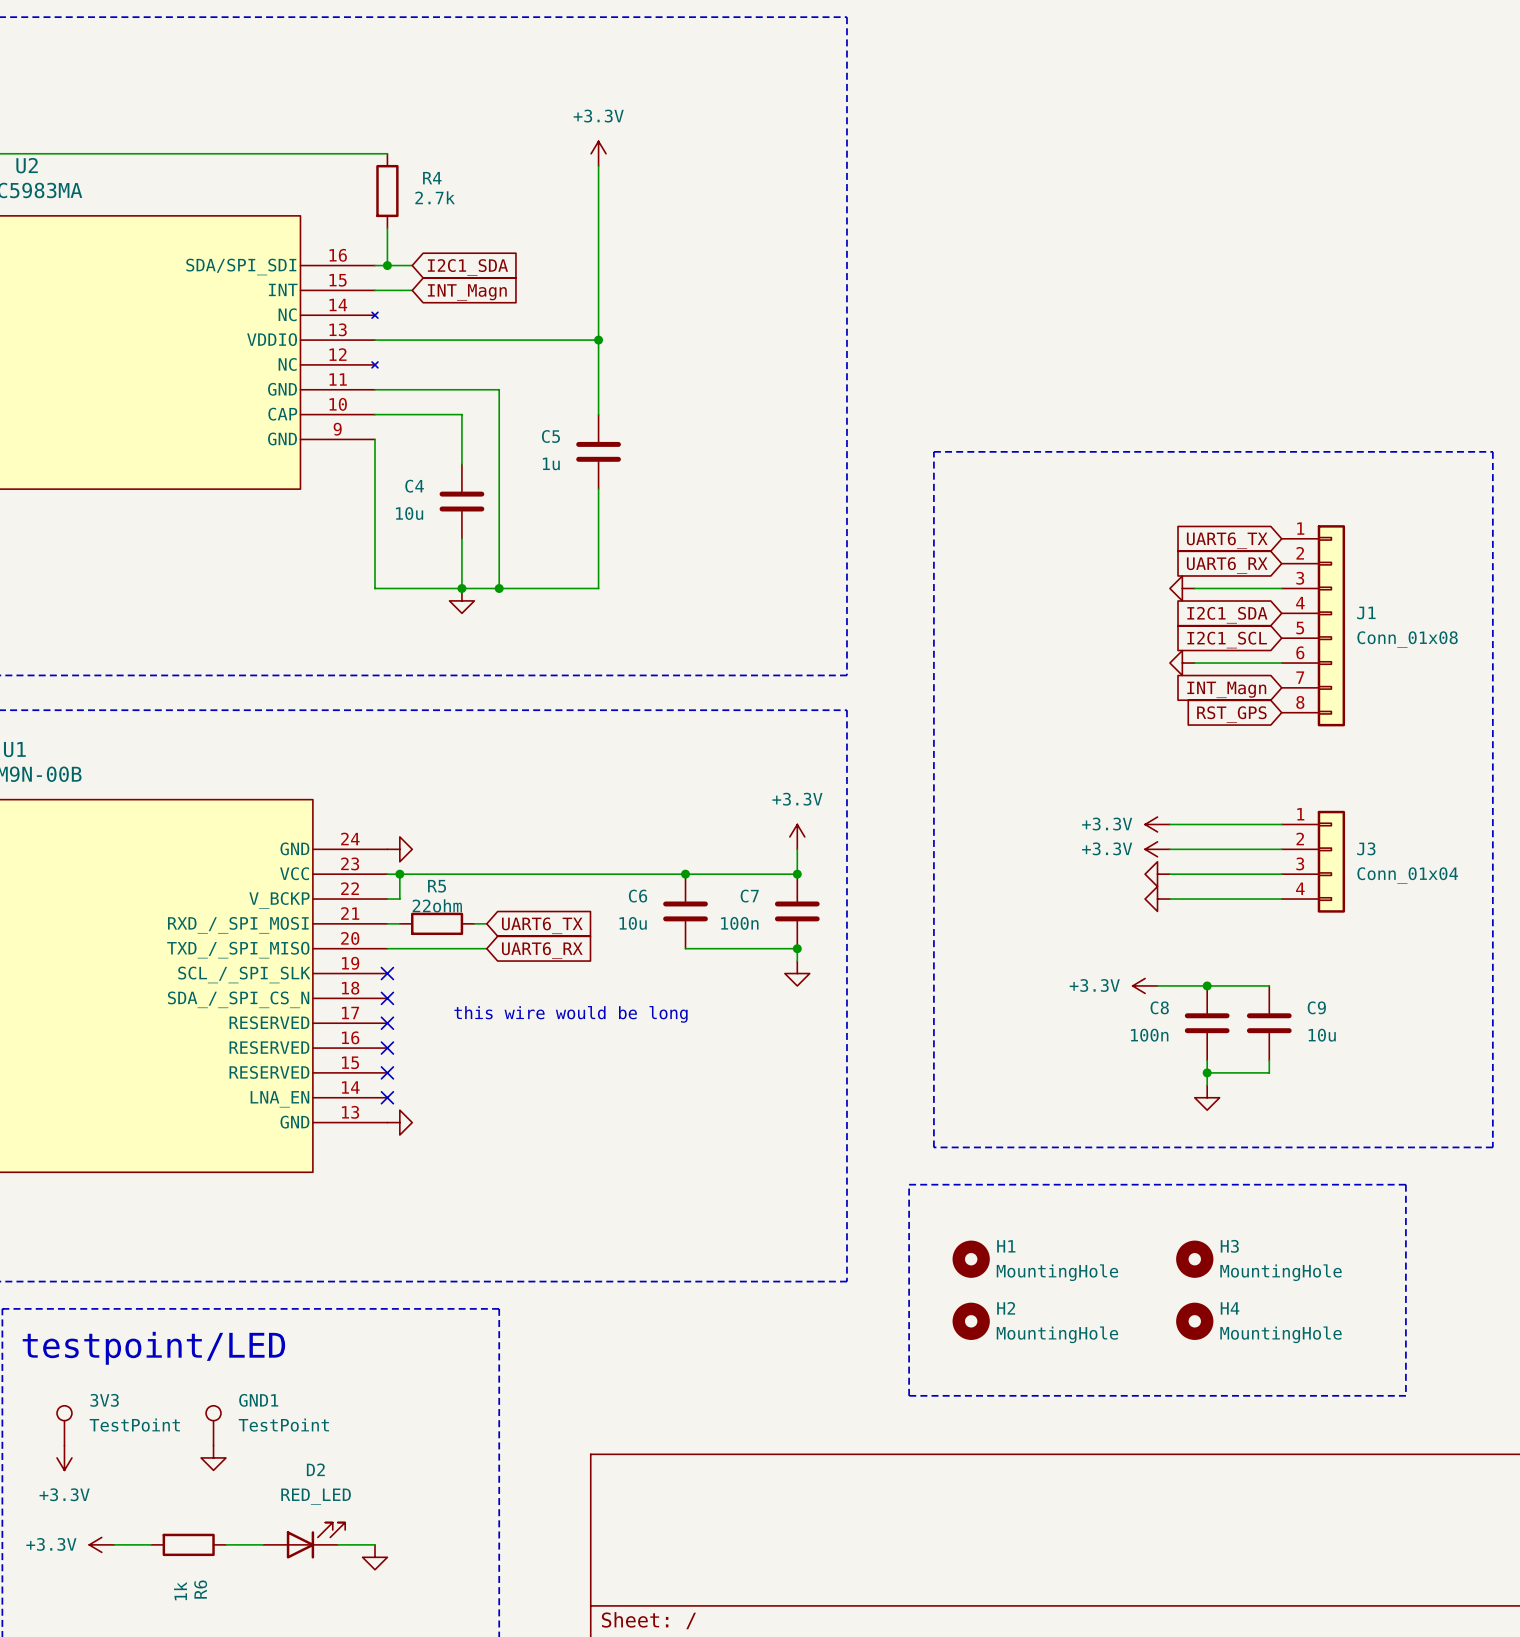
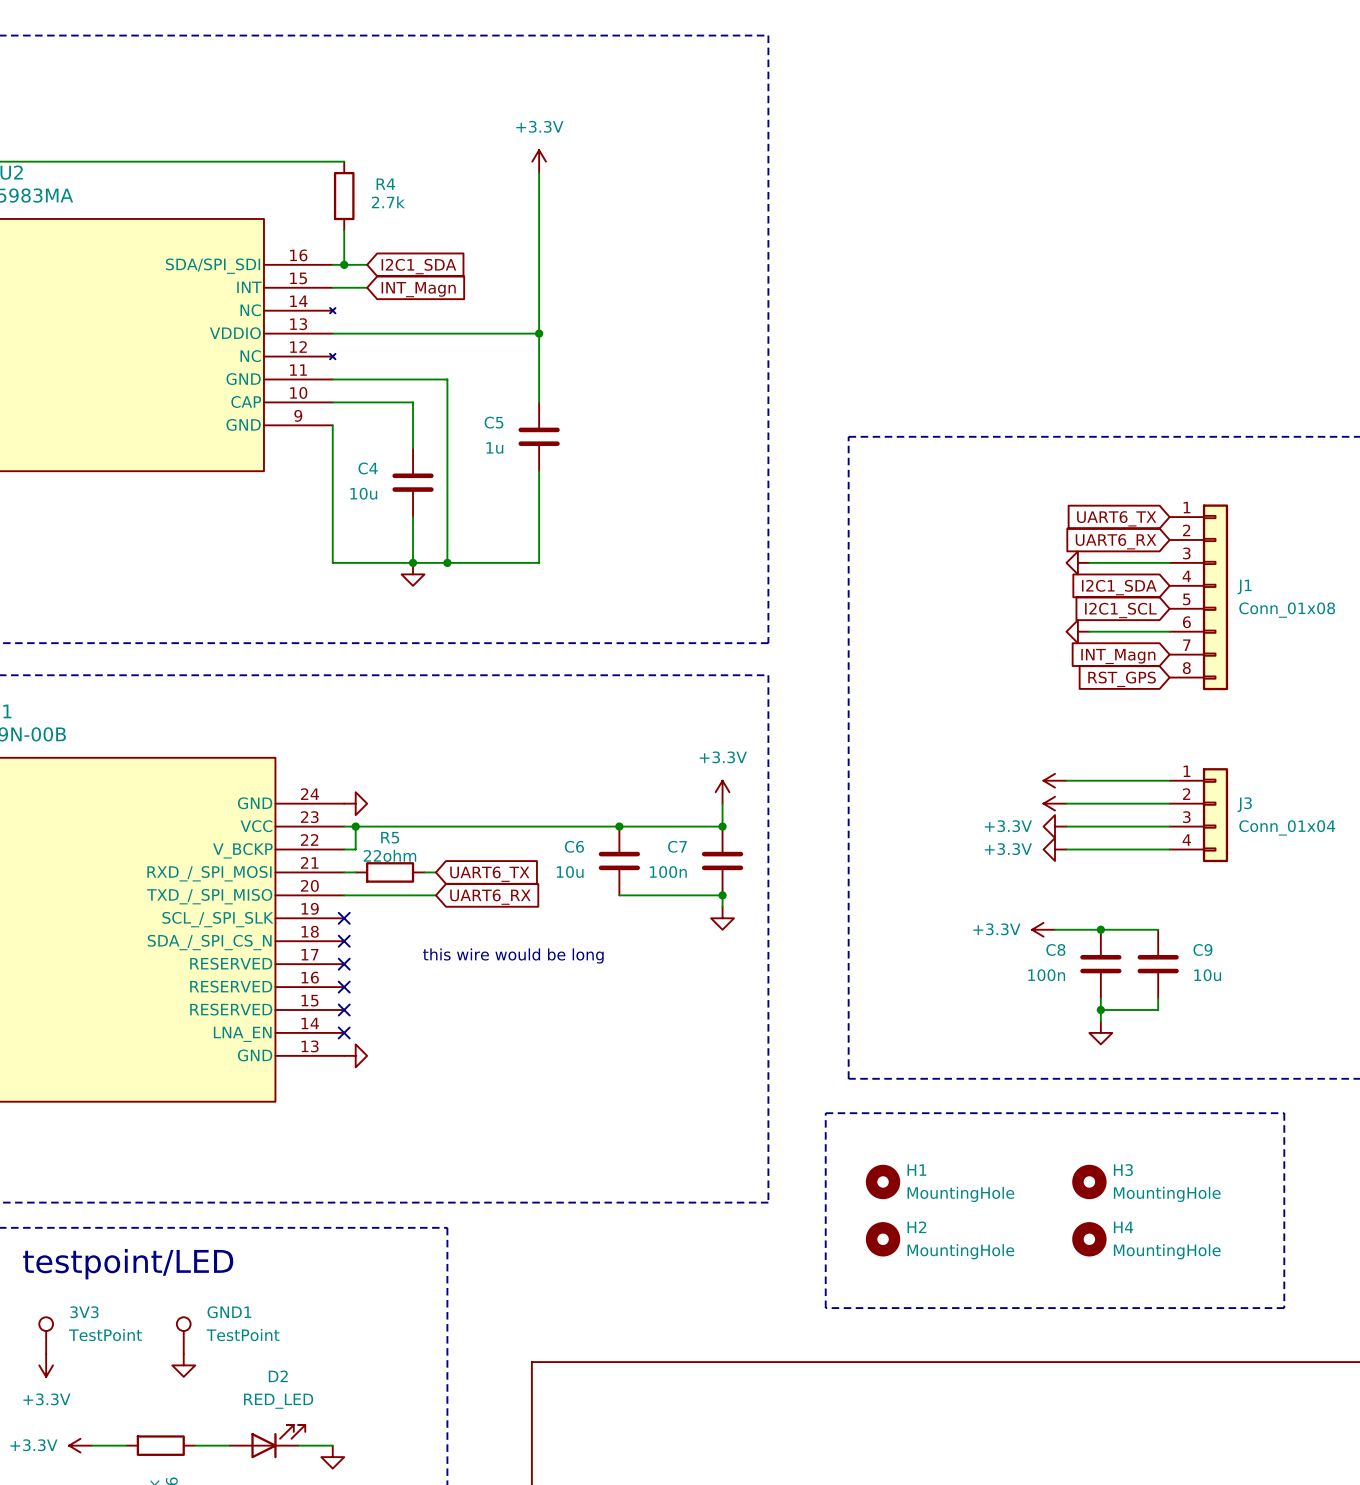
power symbol text: +3.3V (1107, 824) -> none
power symbol text: +3.3V (1107, 848) -> none
power symbol text: none -> +3.3V (1008, 826)
power symbol text: none -> +3.3V (1008, 849)

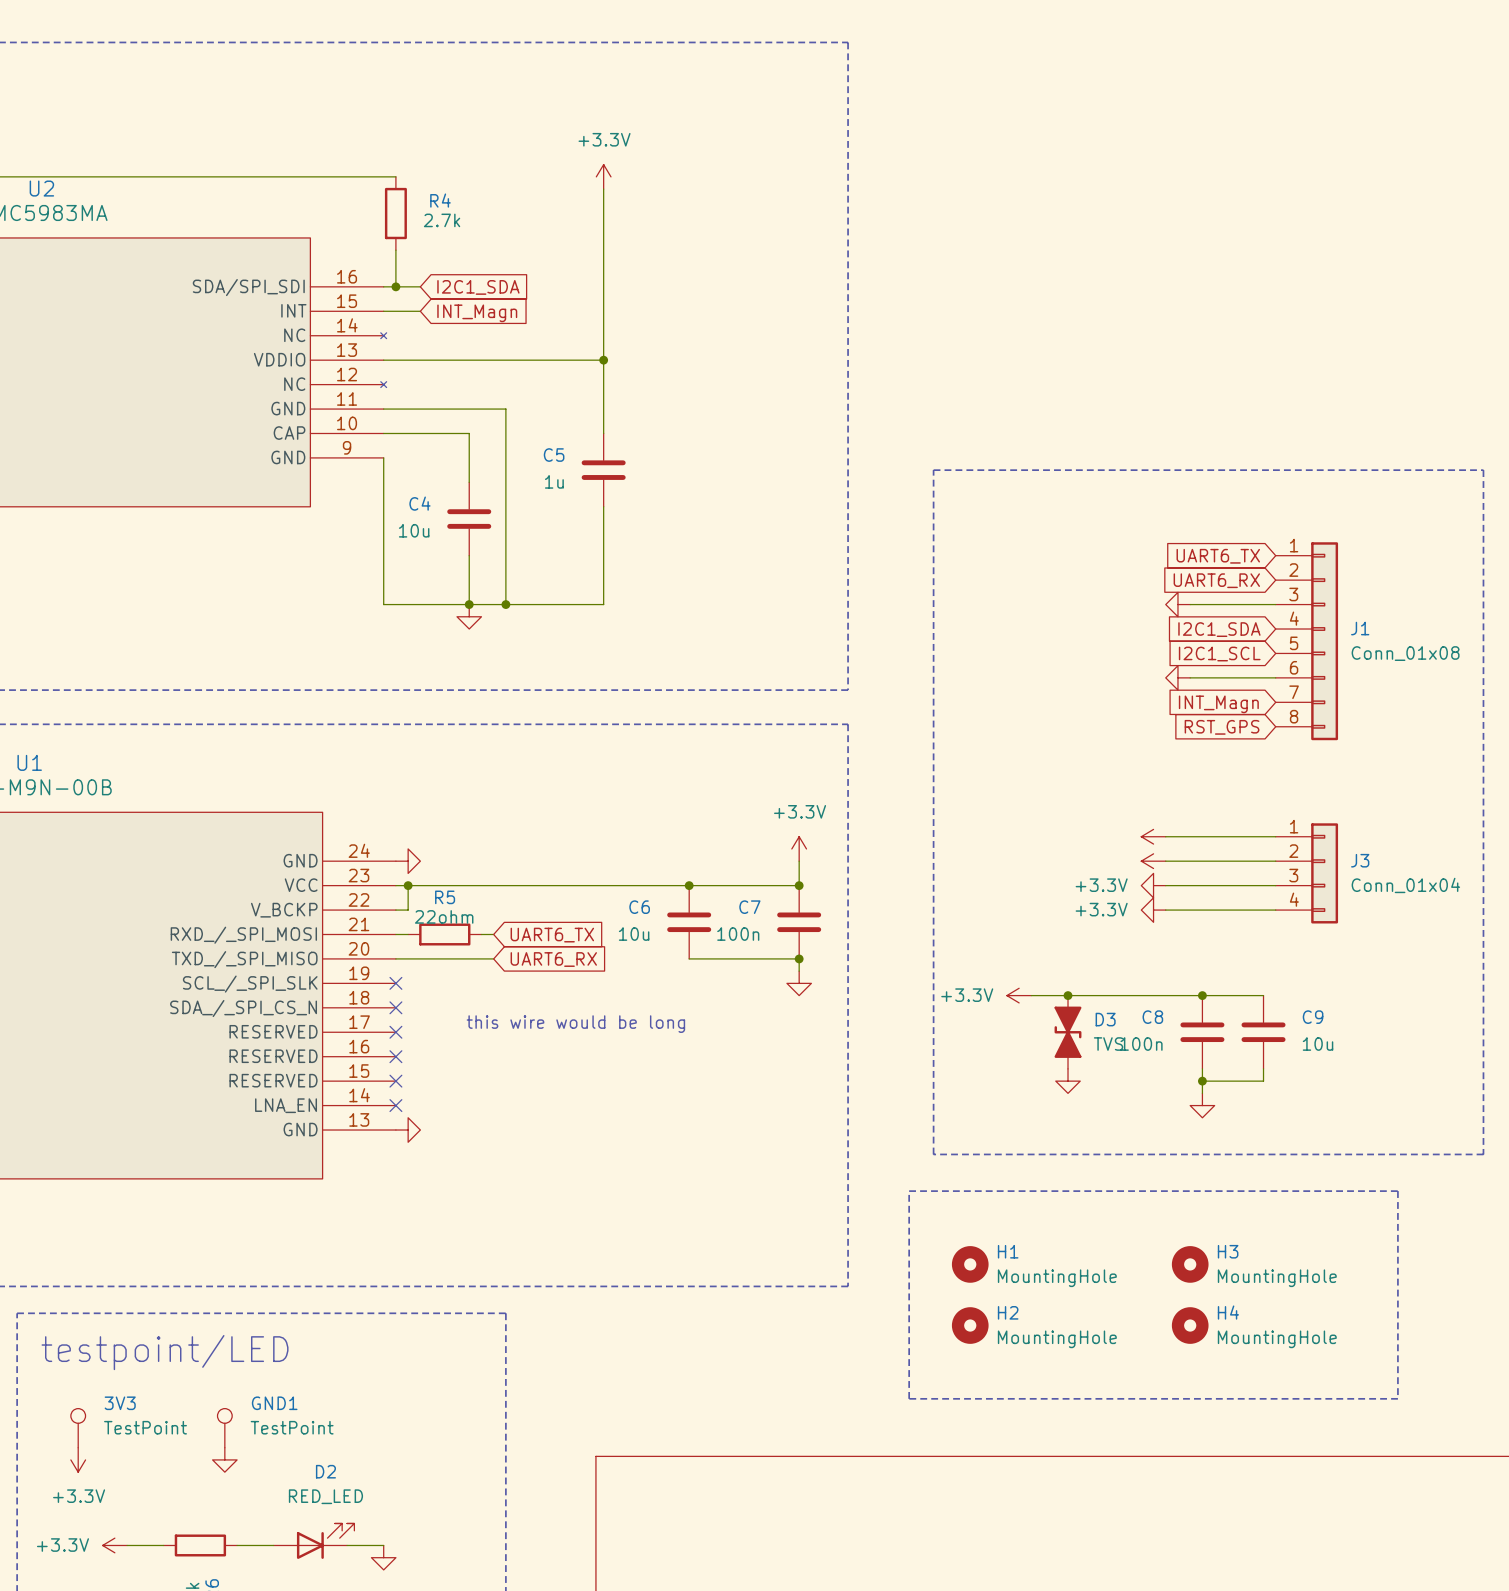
wire: none -> (1031, 995) (1153, 995)
junction: none -> (1068, 995)
power symbol position: +3.3V (1043, 929) -> +3.3V (1019, 995)
D3: none -> TVS (1068, 1032)
power symbol: none -> (1068, 1081)

